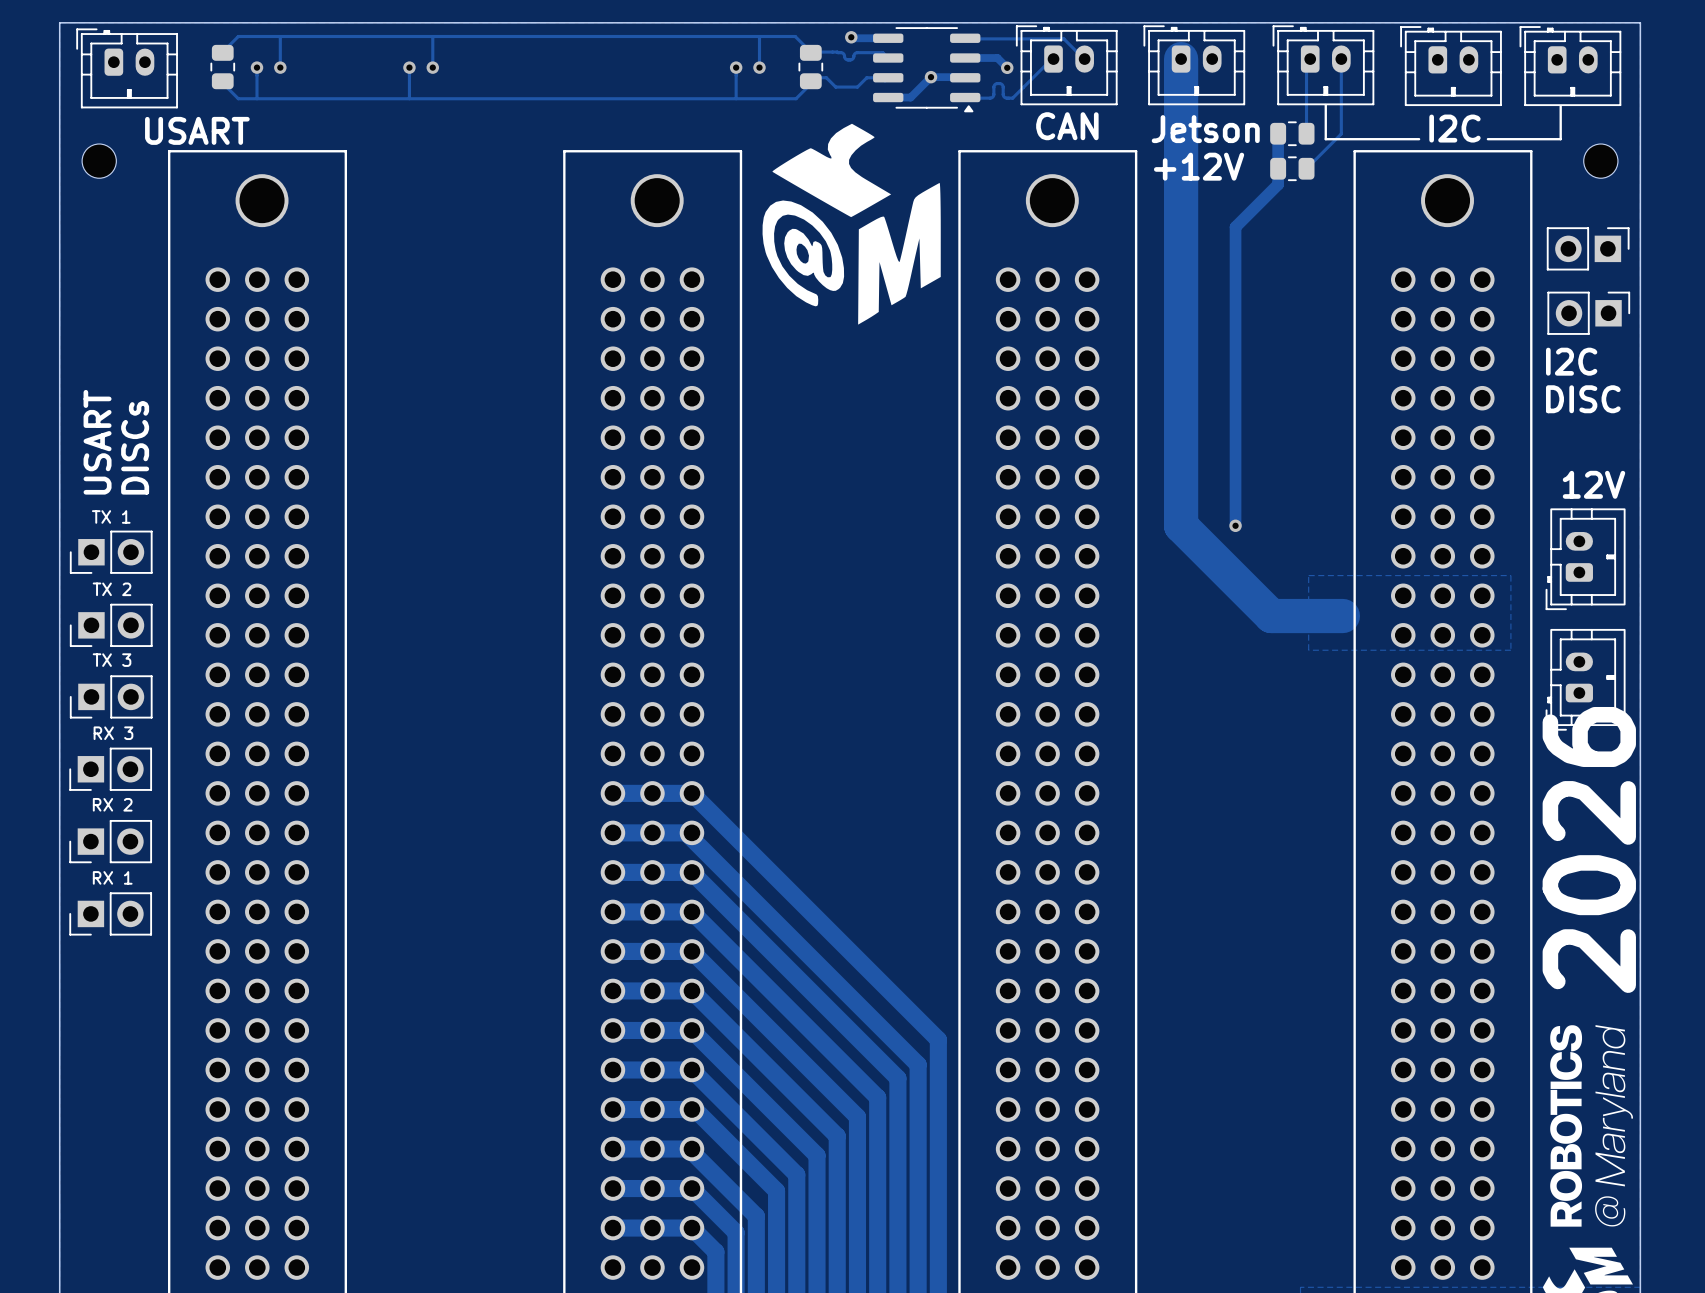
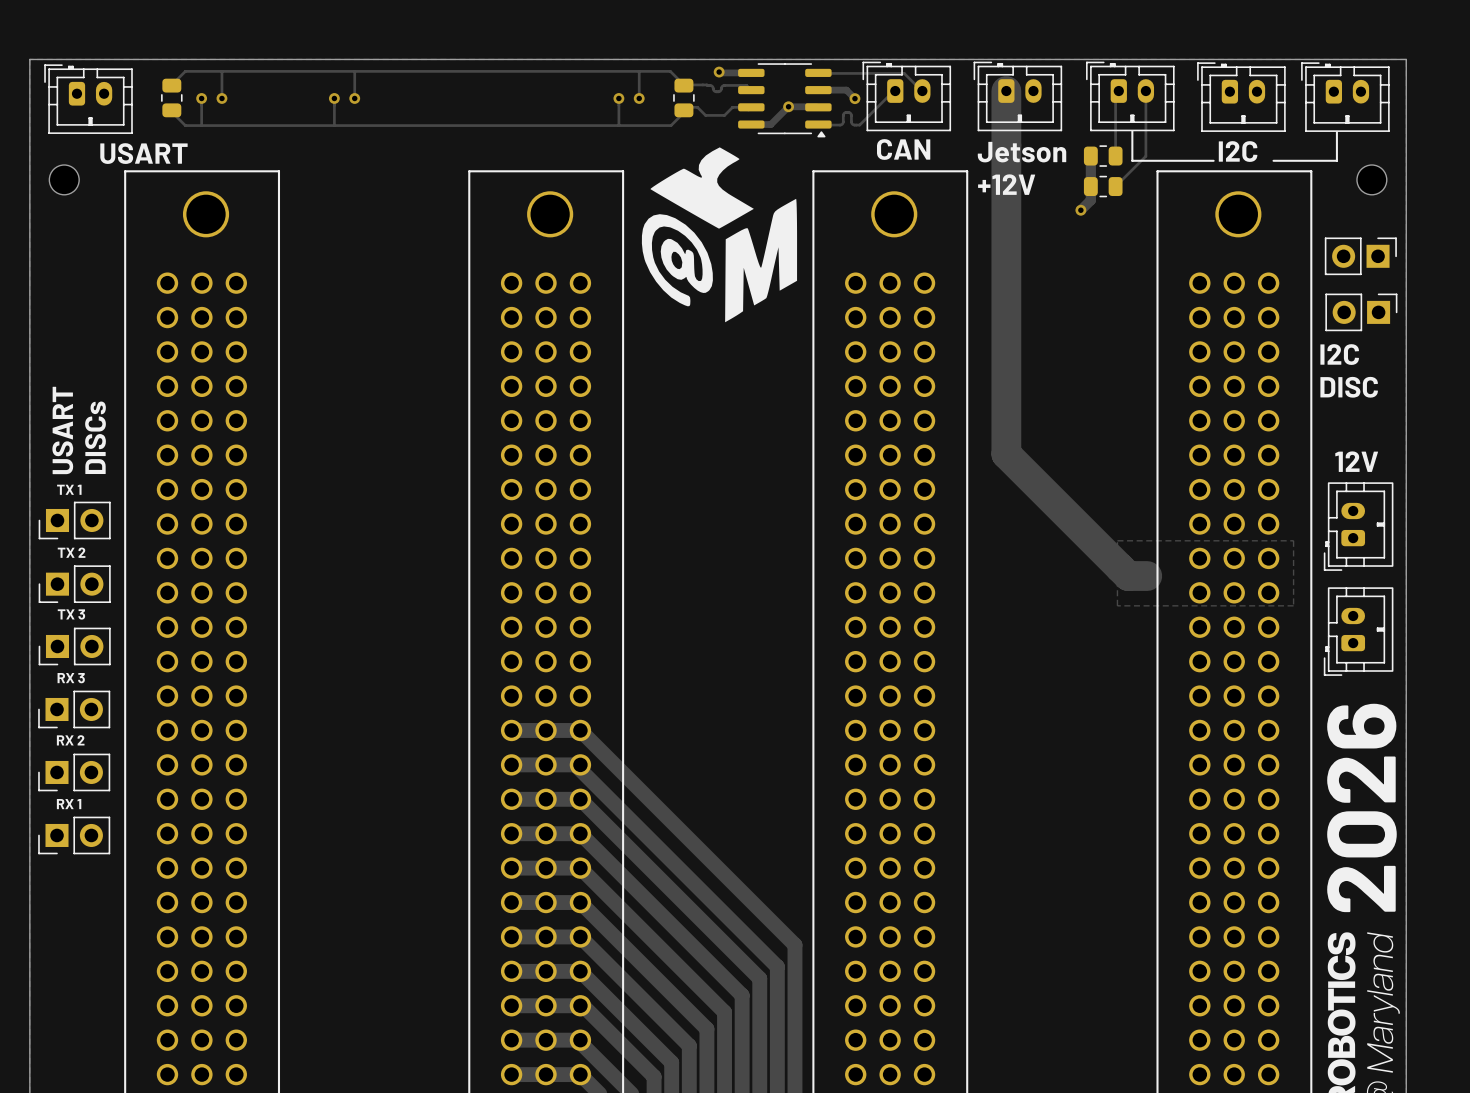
track: (1266, 195) (1235, 227) (1235, 525) -> none
via: none -> (1080, 210)
track: (1181, 476) (1181, 525) (1271, 616) (1321, 616) -> (1006, 454) (1128, 576)
via: (1235, 525) -> none

